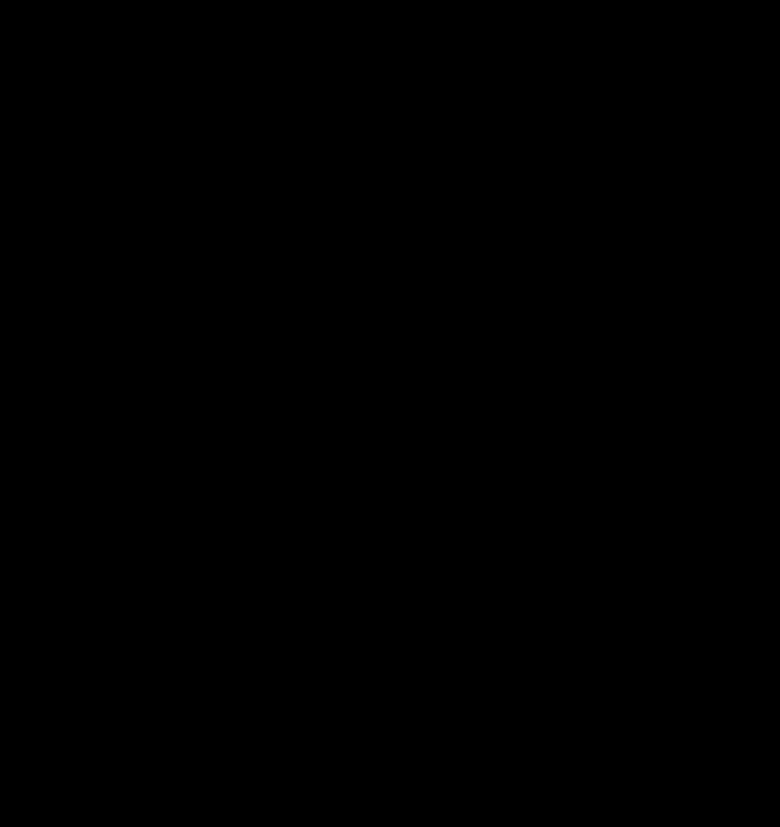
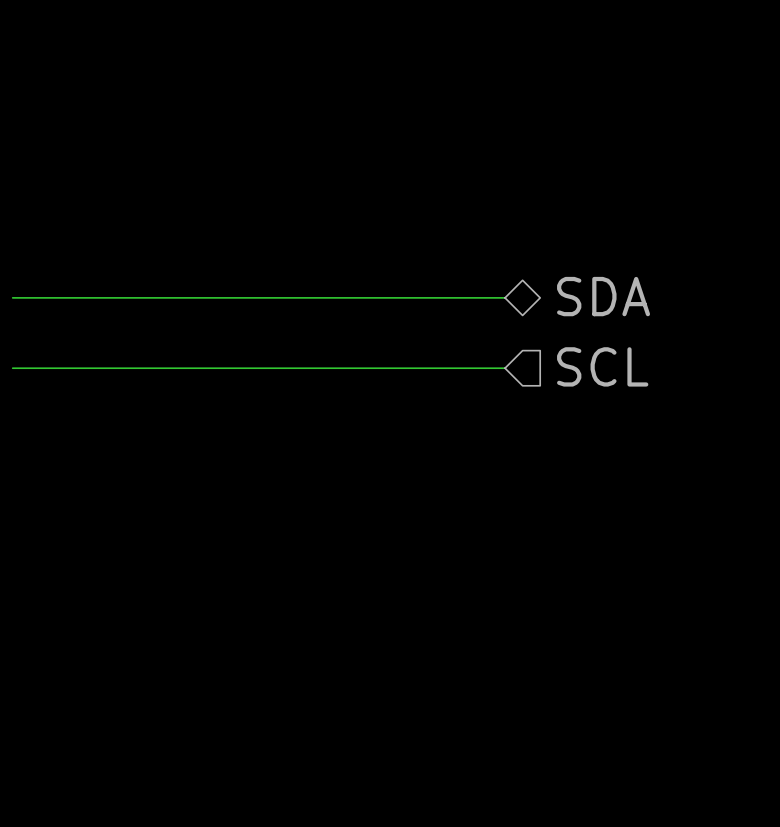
hierarchical label: none -> SDA (603, 296)
wire: none -> (12, 297) (505, 297)
hierarchical label: none -> SCL (602, 366)
wire: none -> (12, 368) (505, 368)

